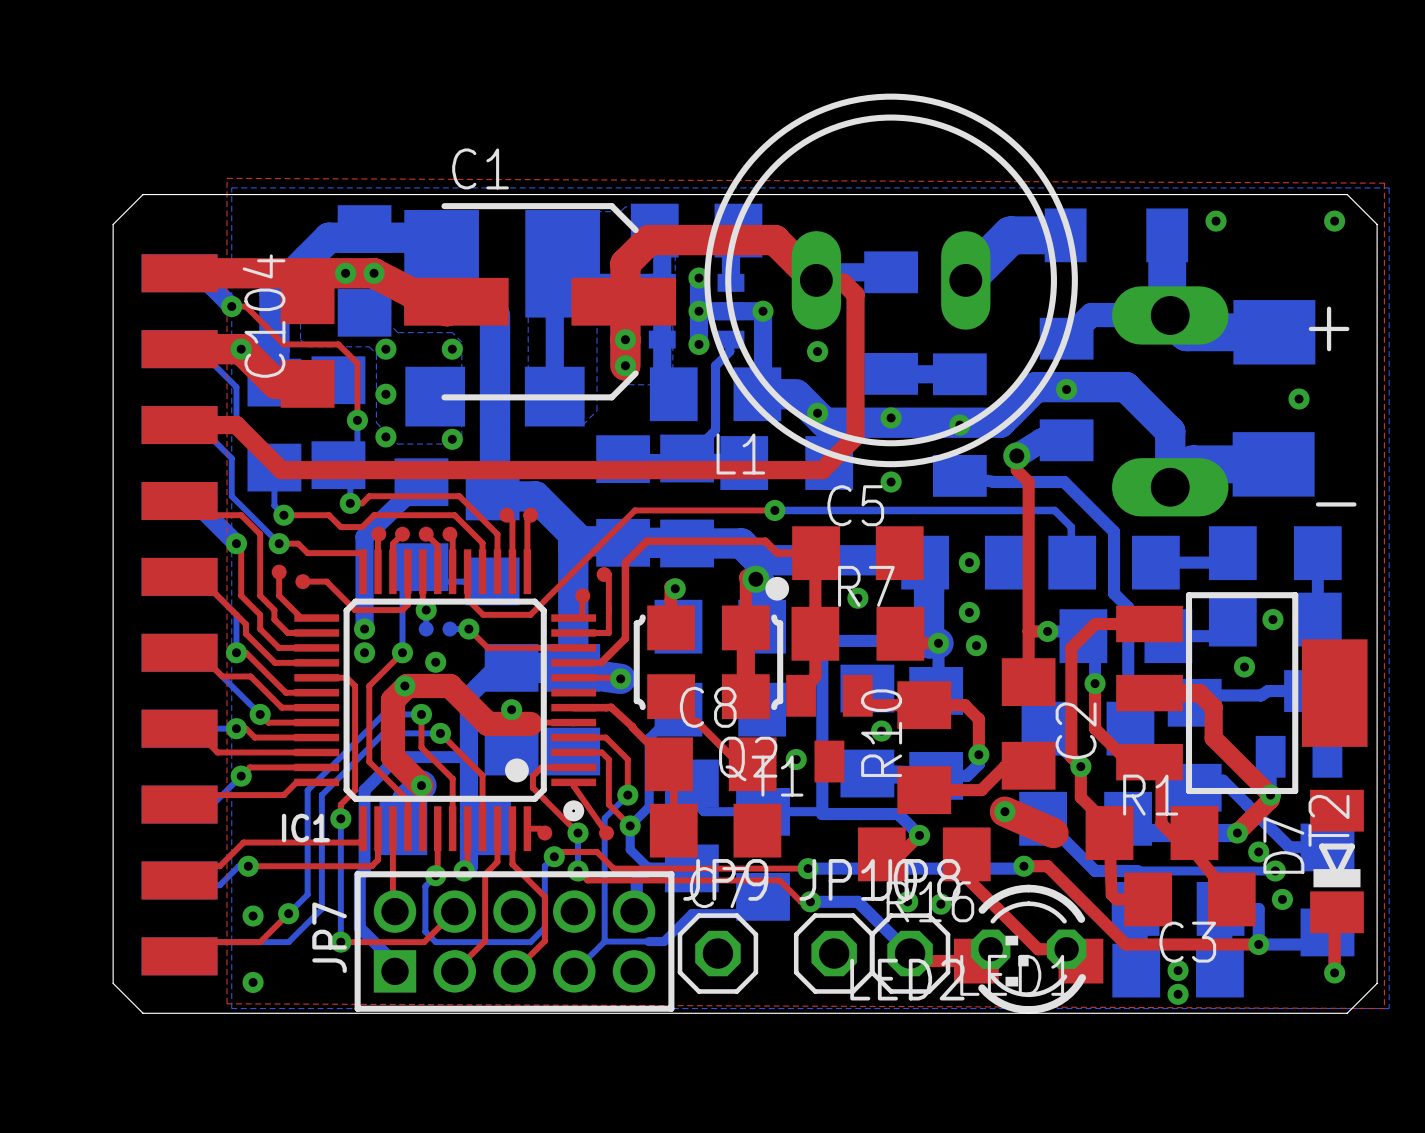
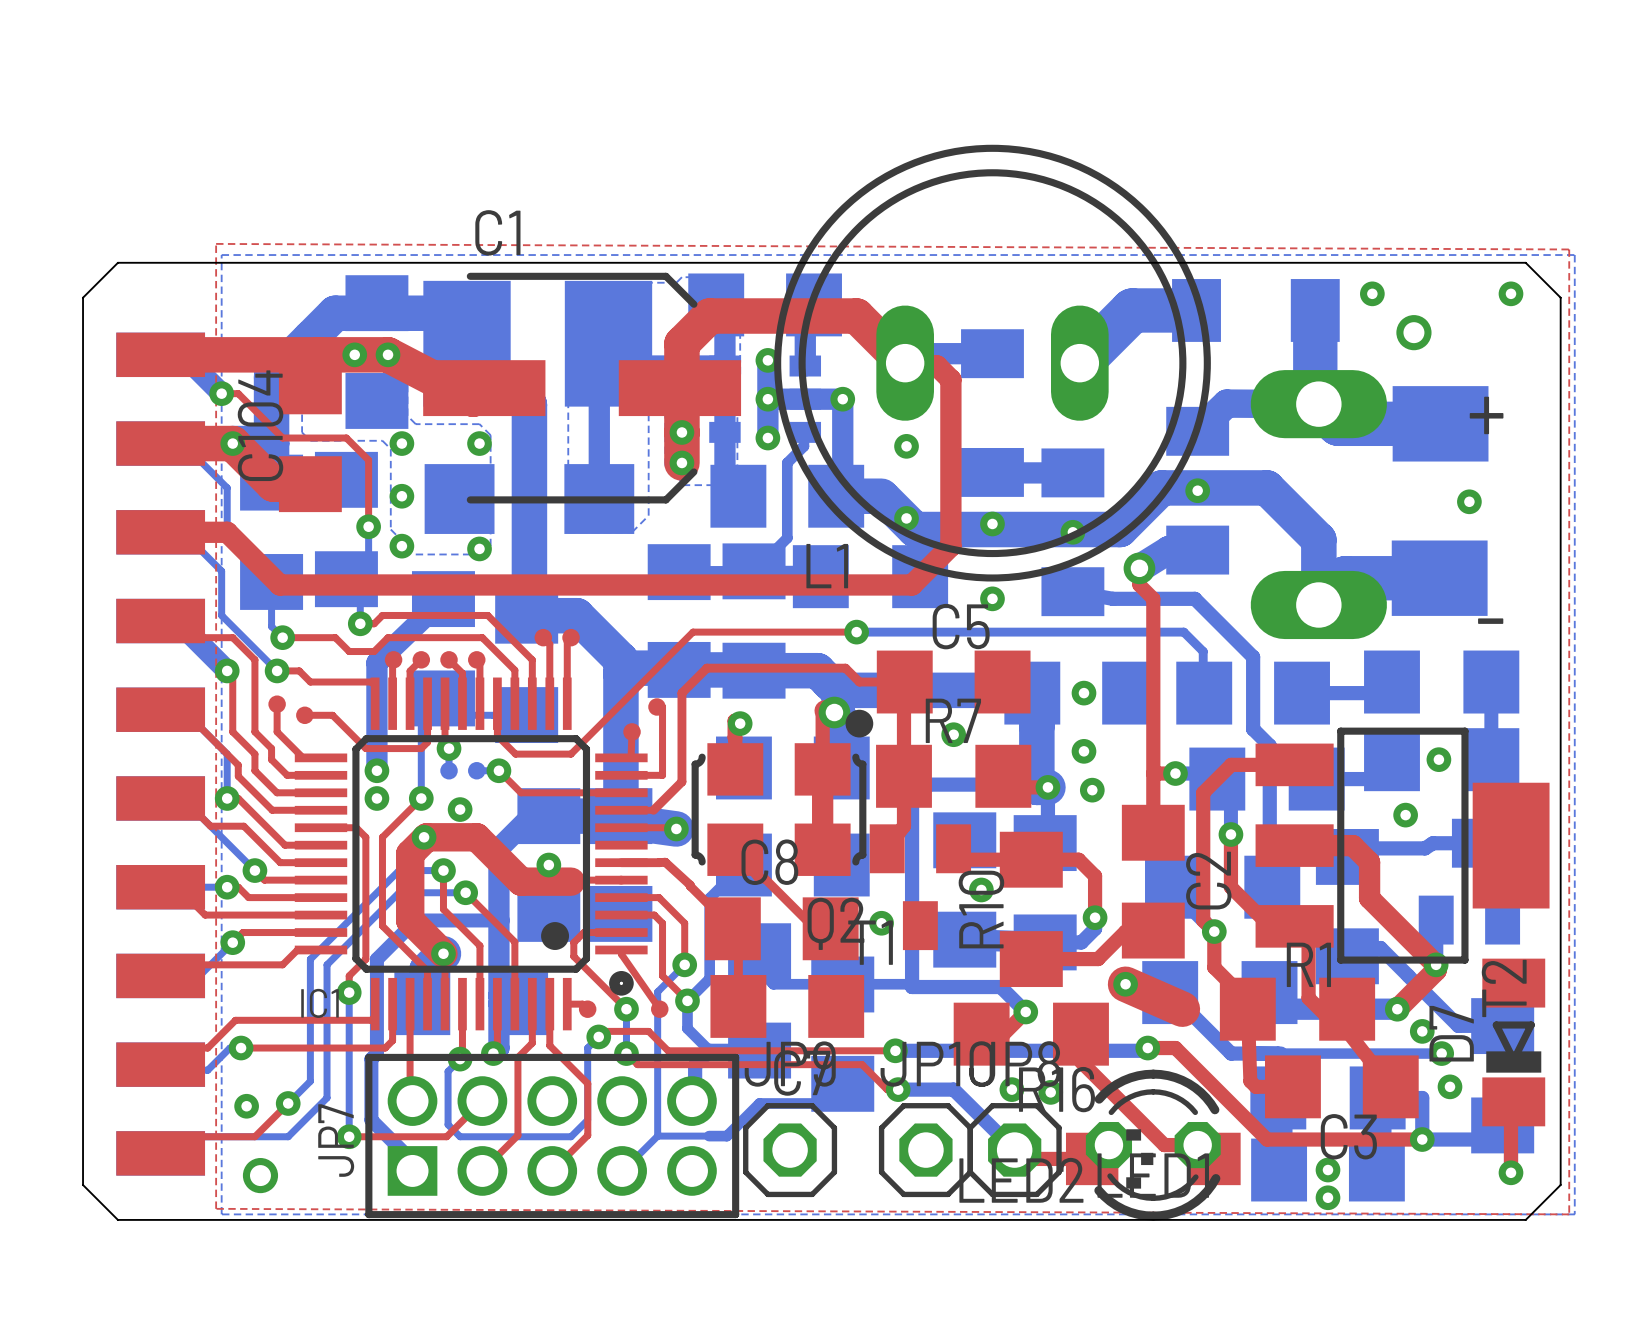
via: none -> (1413, 332)
via size: [242, 971, 264, 994] -> [242, 1157, 279, 1194]

